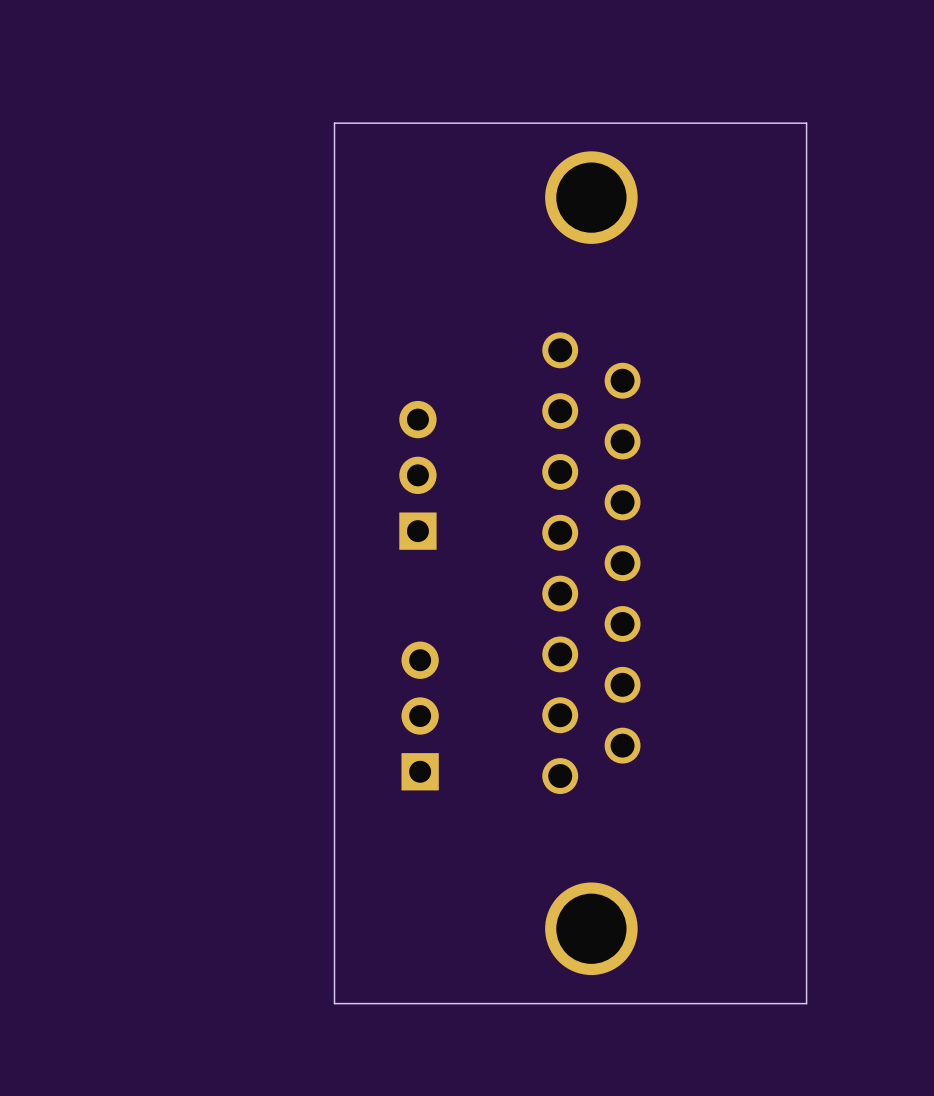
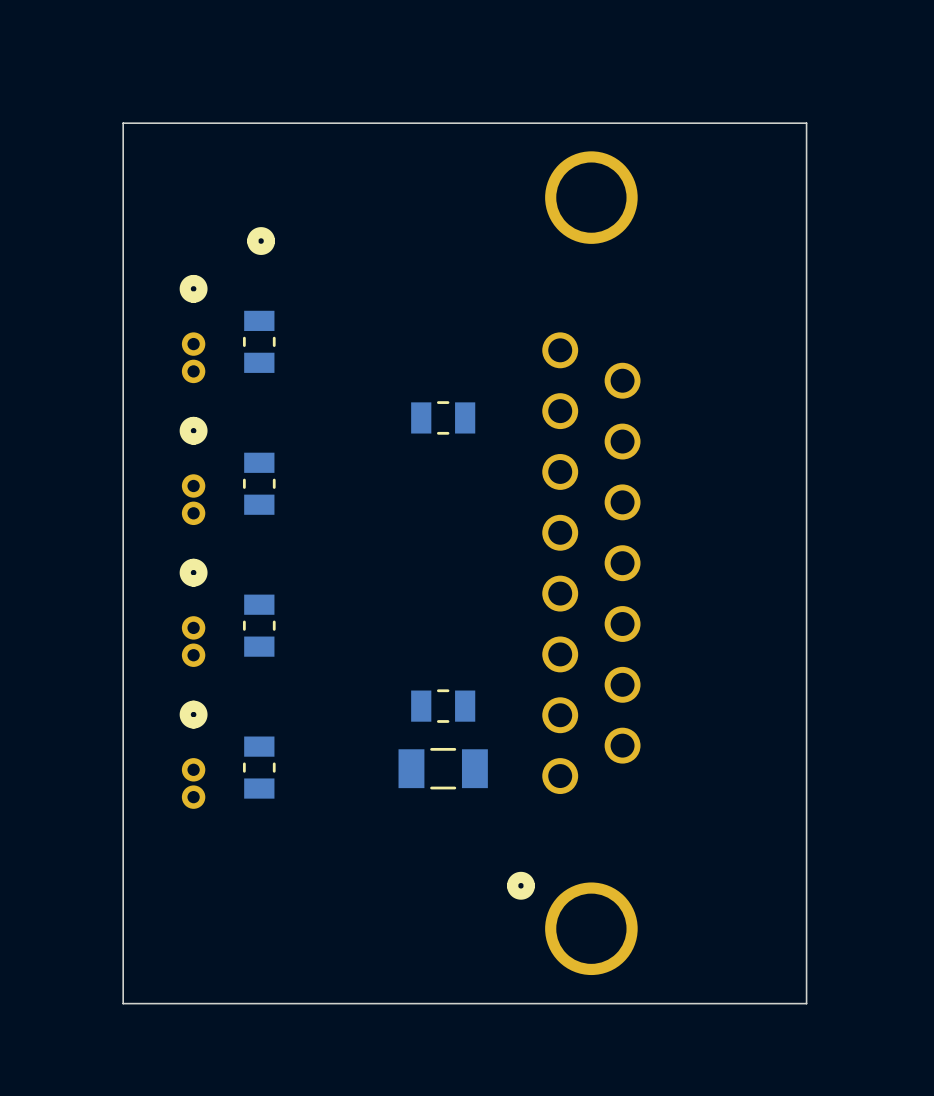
board edge: (334, 123) (334, 1003) -> (334, 123) (123, 123) (123, 1003) (334, 1003)
part: none -> (261, 241)
part: none -> (193, 329)
part: none -> (259, 341)
part: none -> (443, 417)
part: none -> (193, 470)
part: (417, 475) -> none
part: none -> (259, 483)
part: none -> (193, 612)
part: none -> (259, 625)
part: none -> (443, 706)
part: (420, 716) -> none
part: none -> (193, 754)
part: none -> (259, 767)
part: none -> (443, 768)
part: none -> (520, 885)

